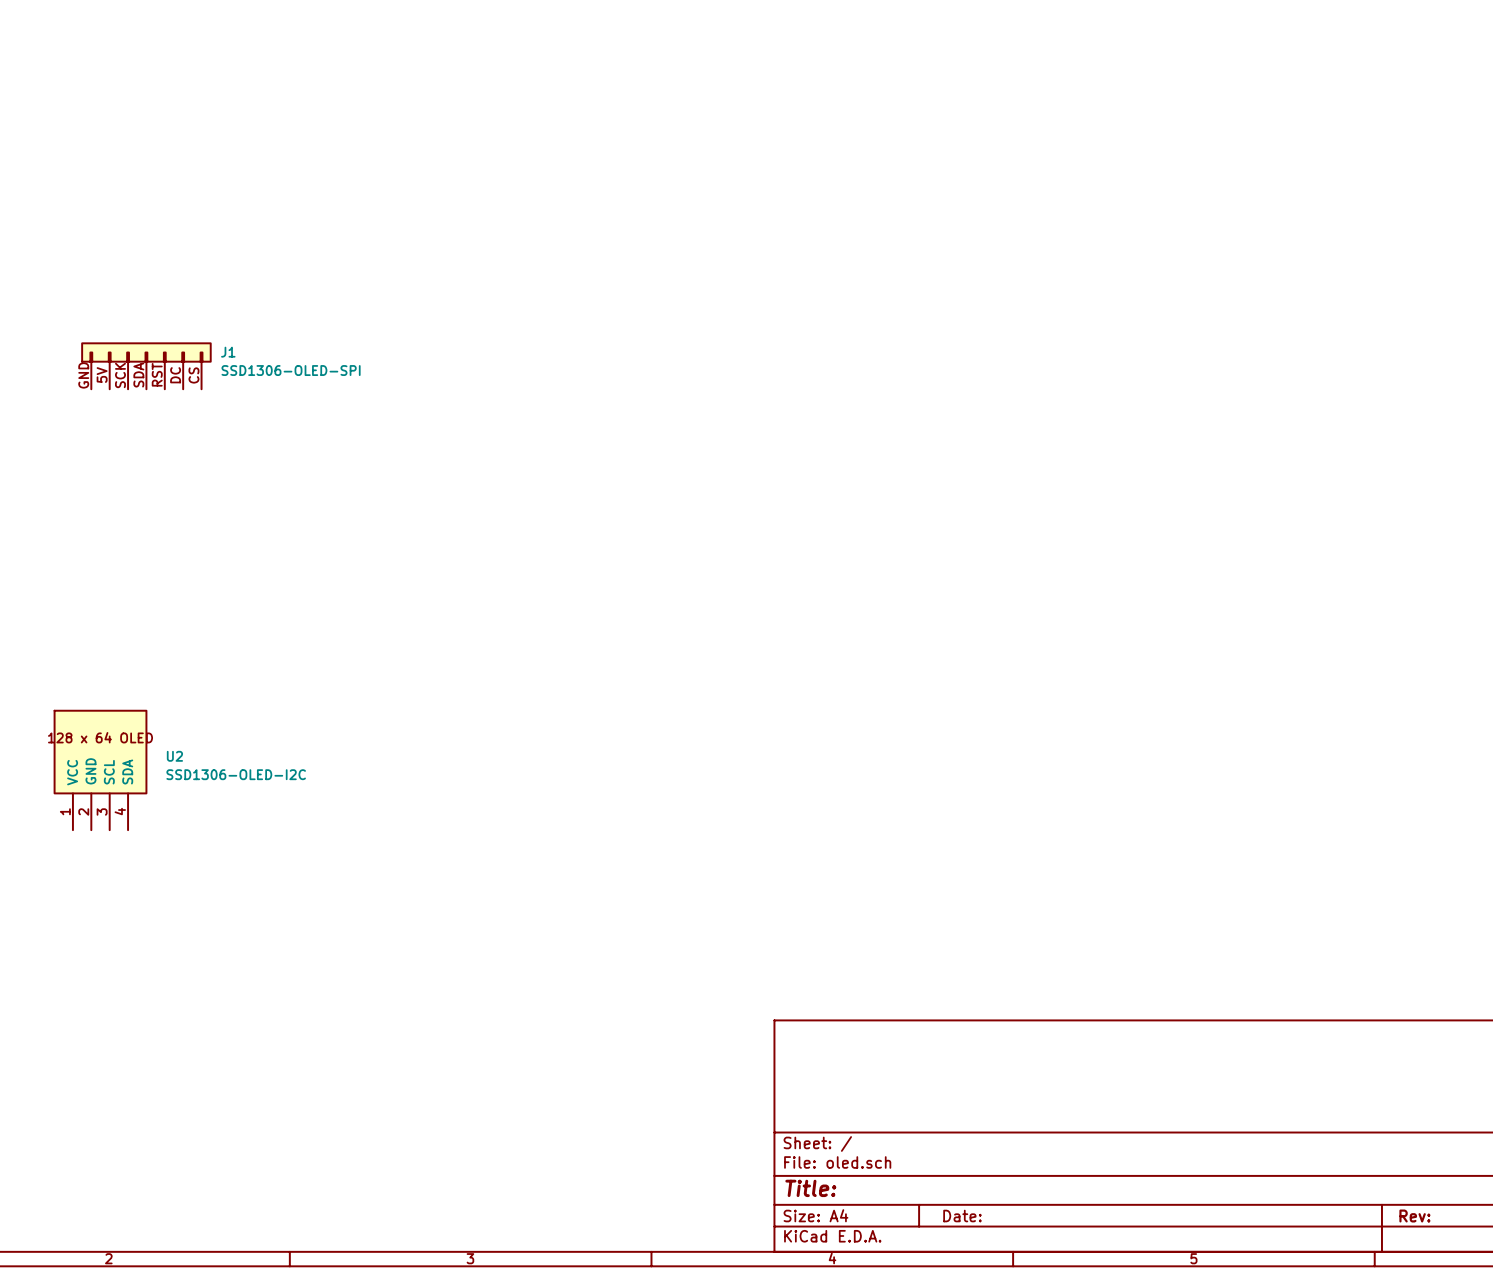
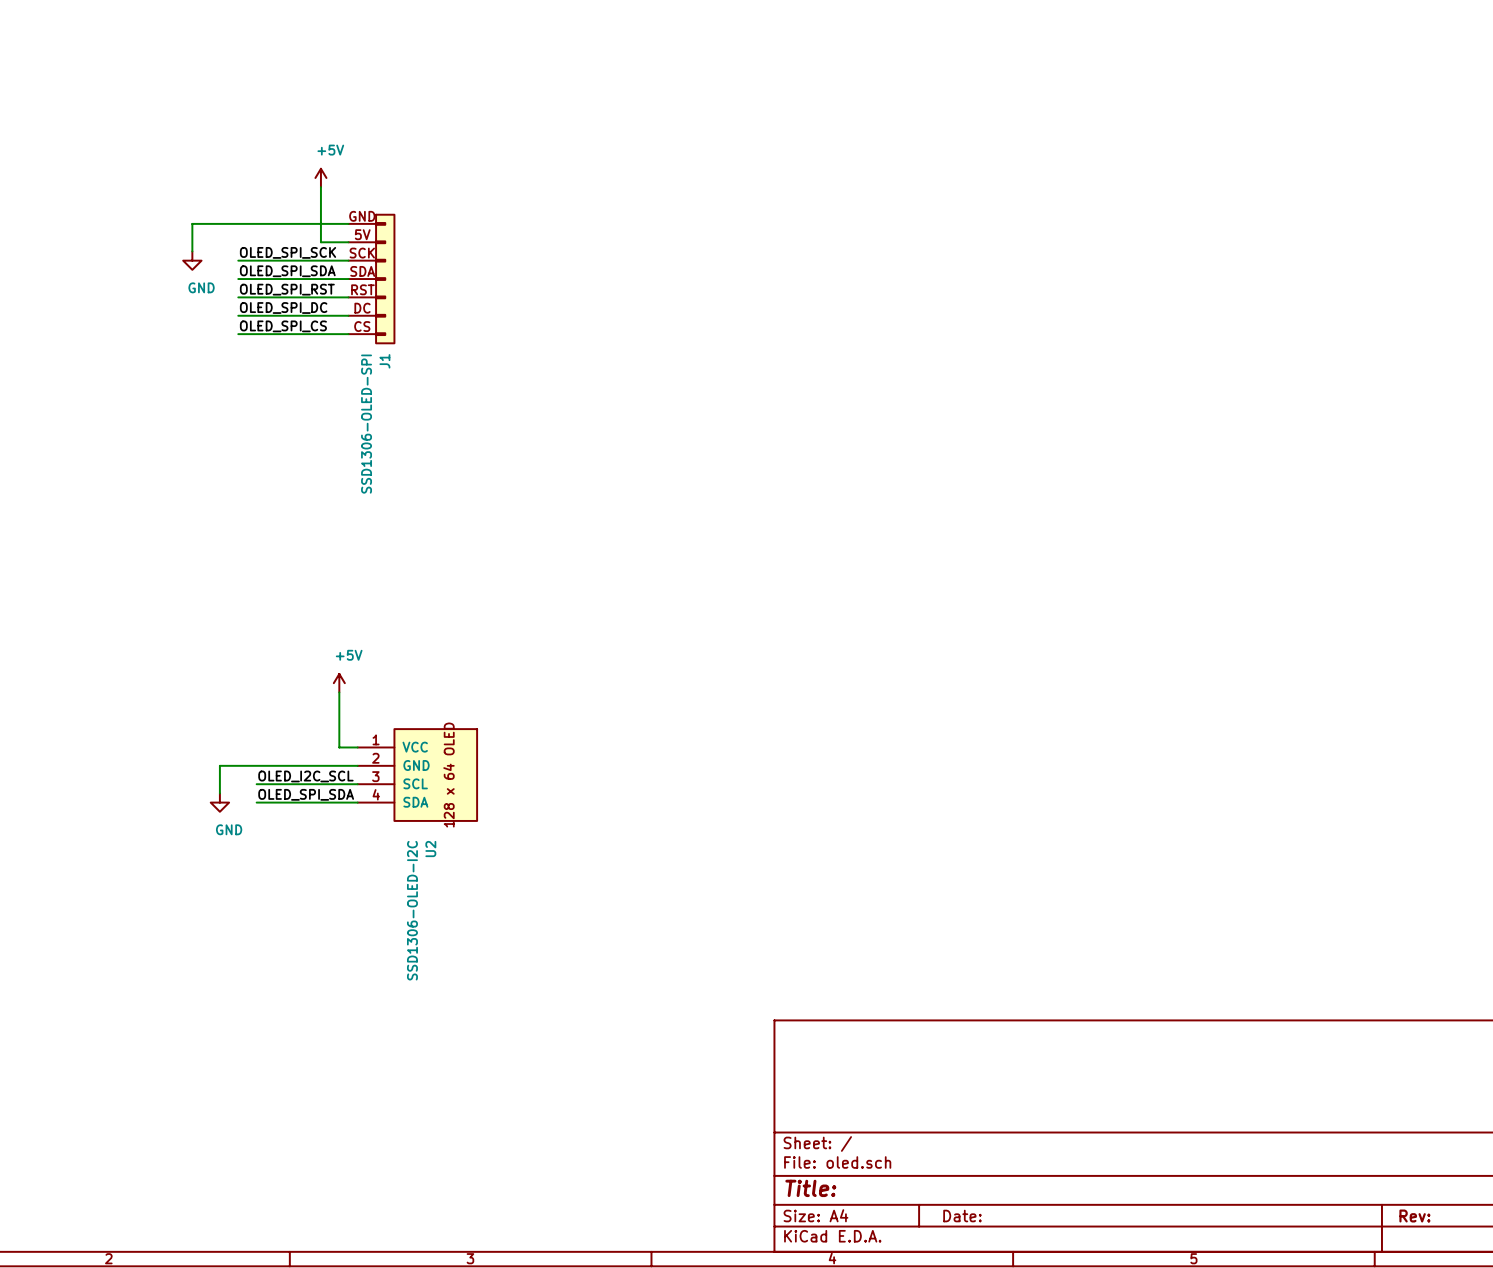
power symbol: none -> +5V (320, 177)
wire: none -> (320, 187) (320, 242) (348, 242)
wire: none -> (348, 223) (192, 223) (192, 251)
label: none -> OLED_SPI_SCK (288, 252)
power symbol: none -> GND (192, 260)
wire: none -> (238, 260) (348, 260)
label: none -> OLED_SPI_SDA (287, 271)
wire: none -> (238, 279) (348, 279)
label: none -> OLED_SPI_RST (287, 289)
wire: none -> (238, 297) (348, 297)
label: none -> OLED_SPI_DC (283, 308)
wire: none -> (238, 315) (348, 315)
label: none -> OLED_SPI_CS (283, 326)
wire: none -> (238, 334) (348, 334)
J1 rotation: 0° (146, 352) -> 90° clockwise (385, 279)
J1 position: (146, 365) -> (371, 279)
power symbol: none -> +5V (339, 683)
wire: none -> (339, 692) (339, 747) (357, 747)
U2 rotation: 0° (100, 752) -> 90° clockwise (435, 775)
wire: none -> (357, 765) (219, 765) (219, 793)
U2 position: (100, 770) -> (417, 775)
label: none -> OLED_I2C_SCL (305, 776)
wire: none -> (256, 784) (357, 784)
label: none -> OLED_SPI_SDA (306, 794)
power symbol: none -> GND (219, 802)
wire: none -> (256, 802) (357, 802)

